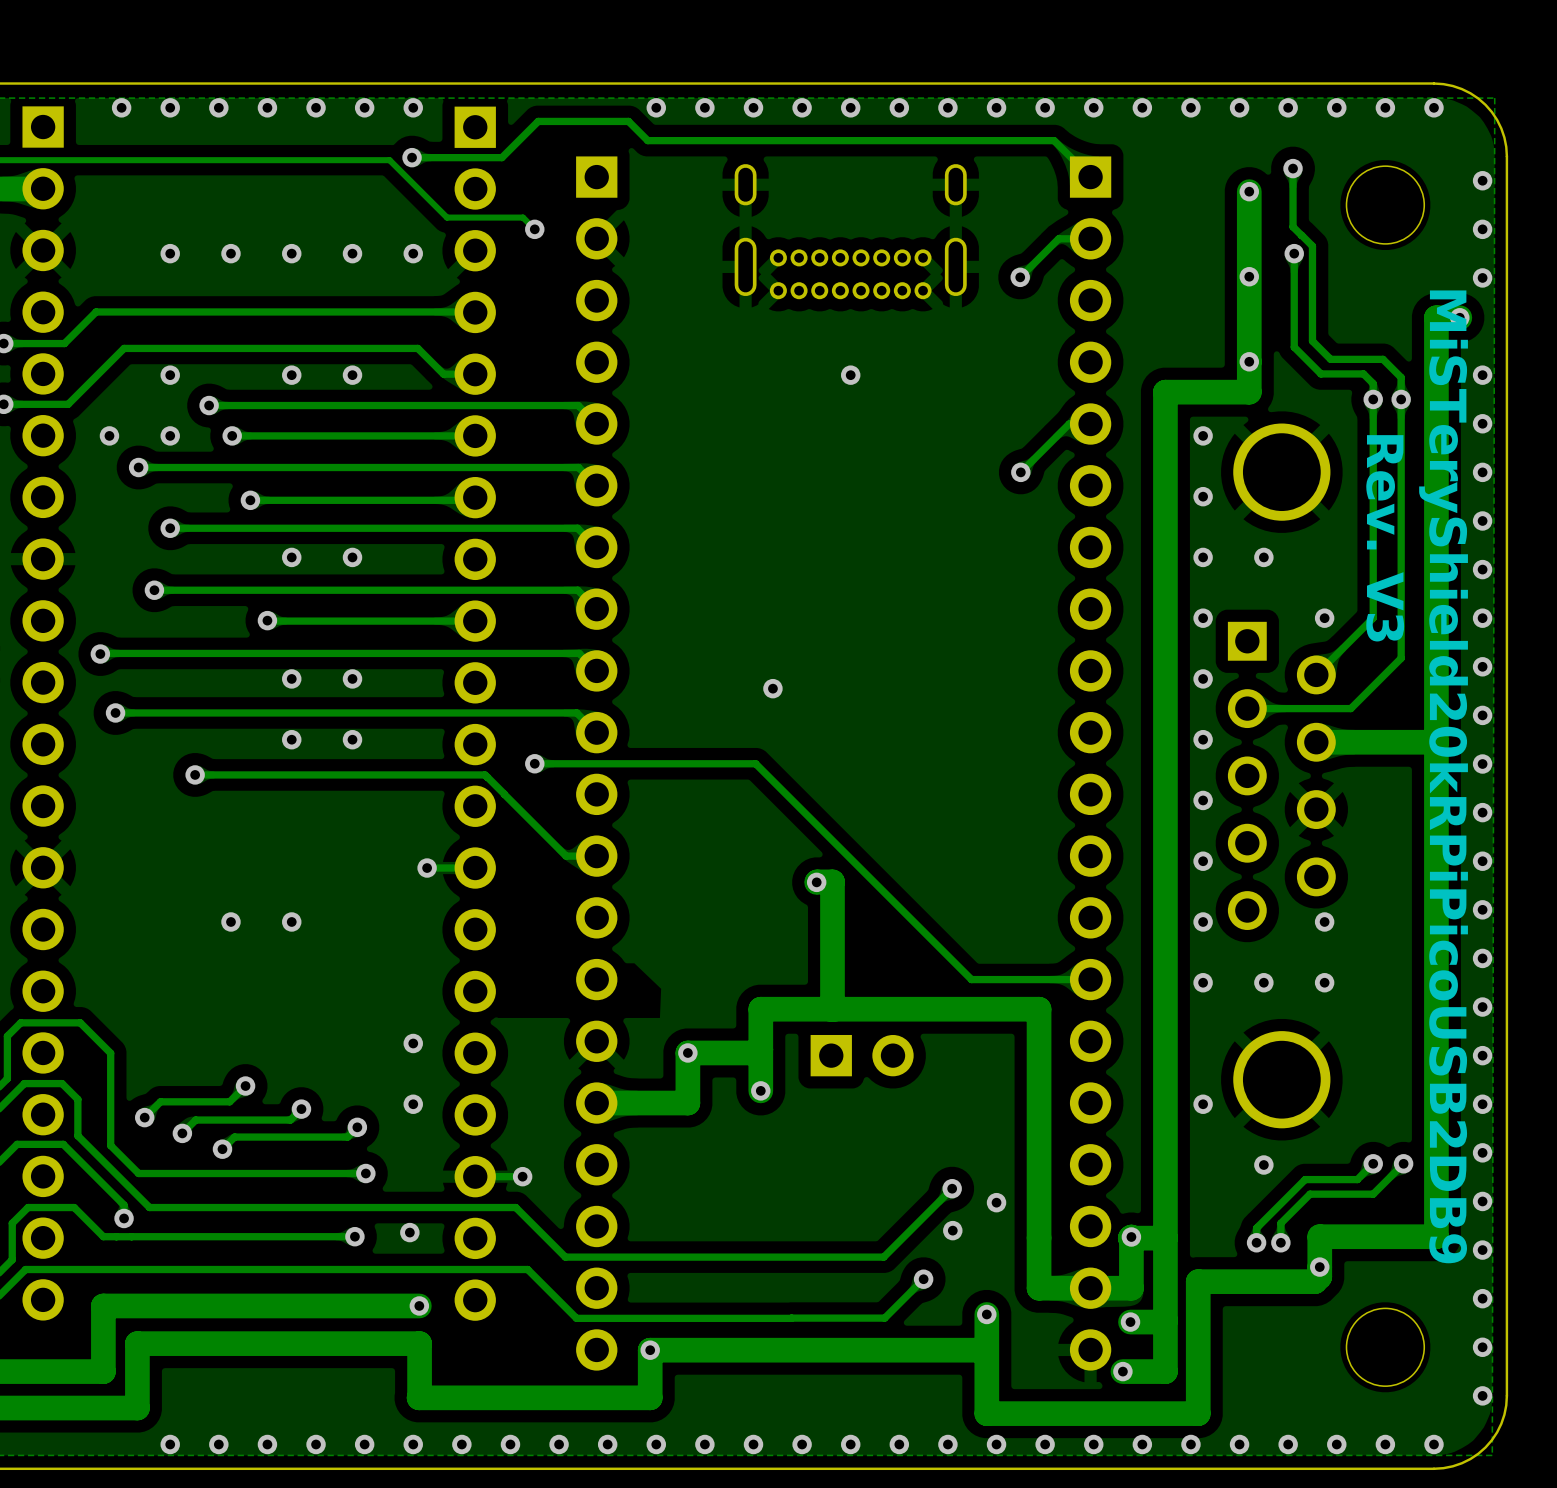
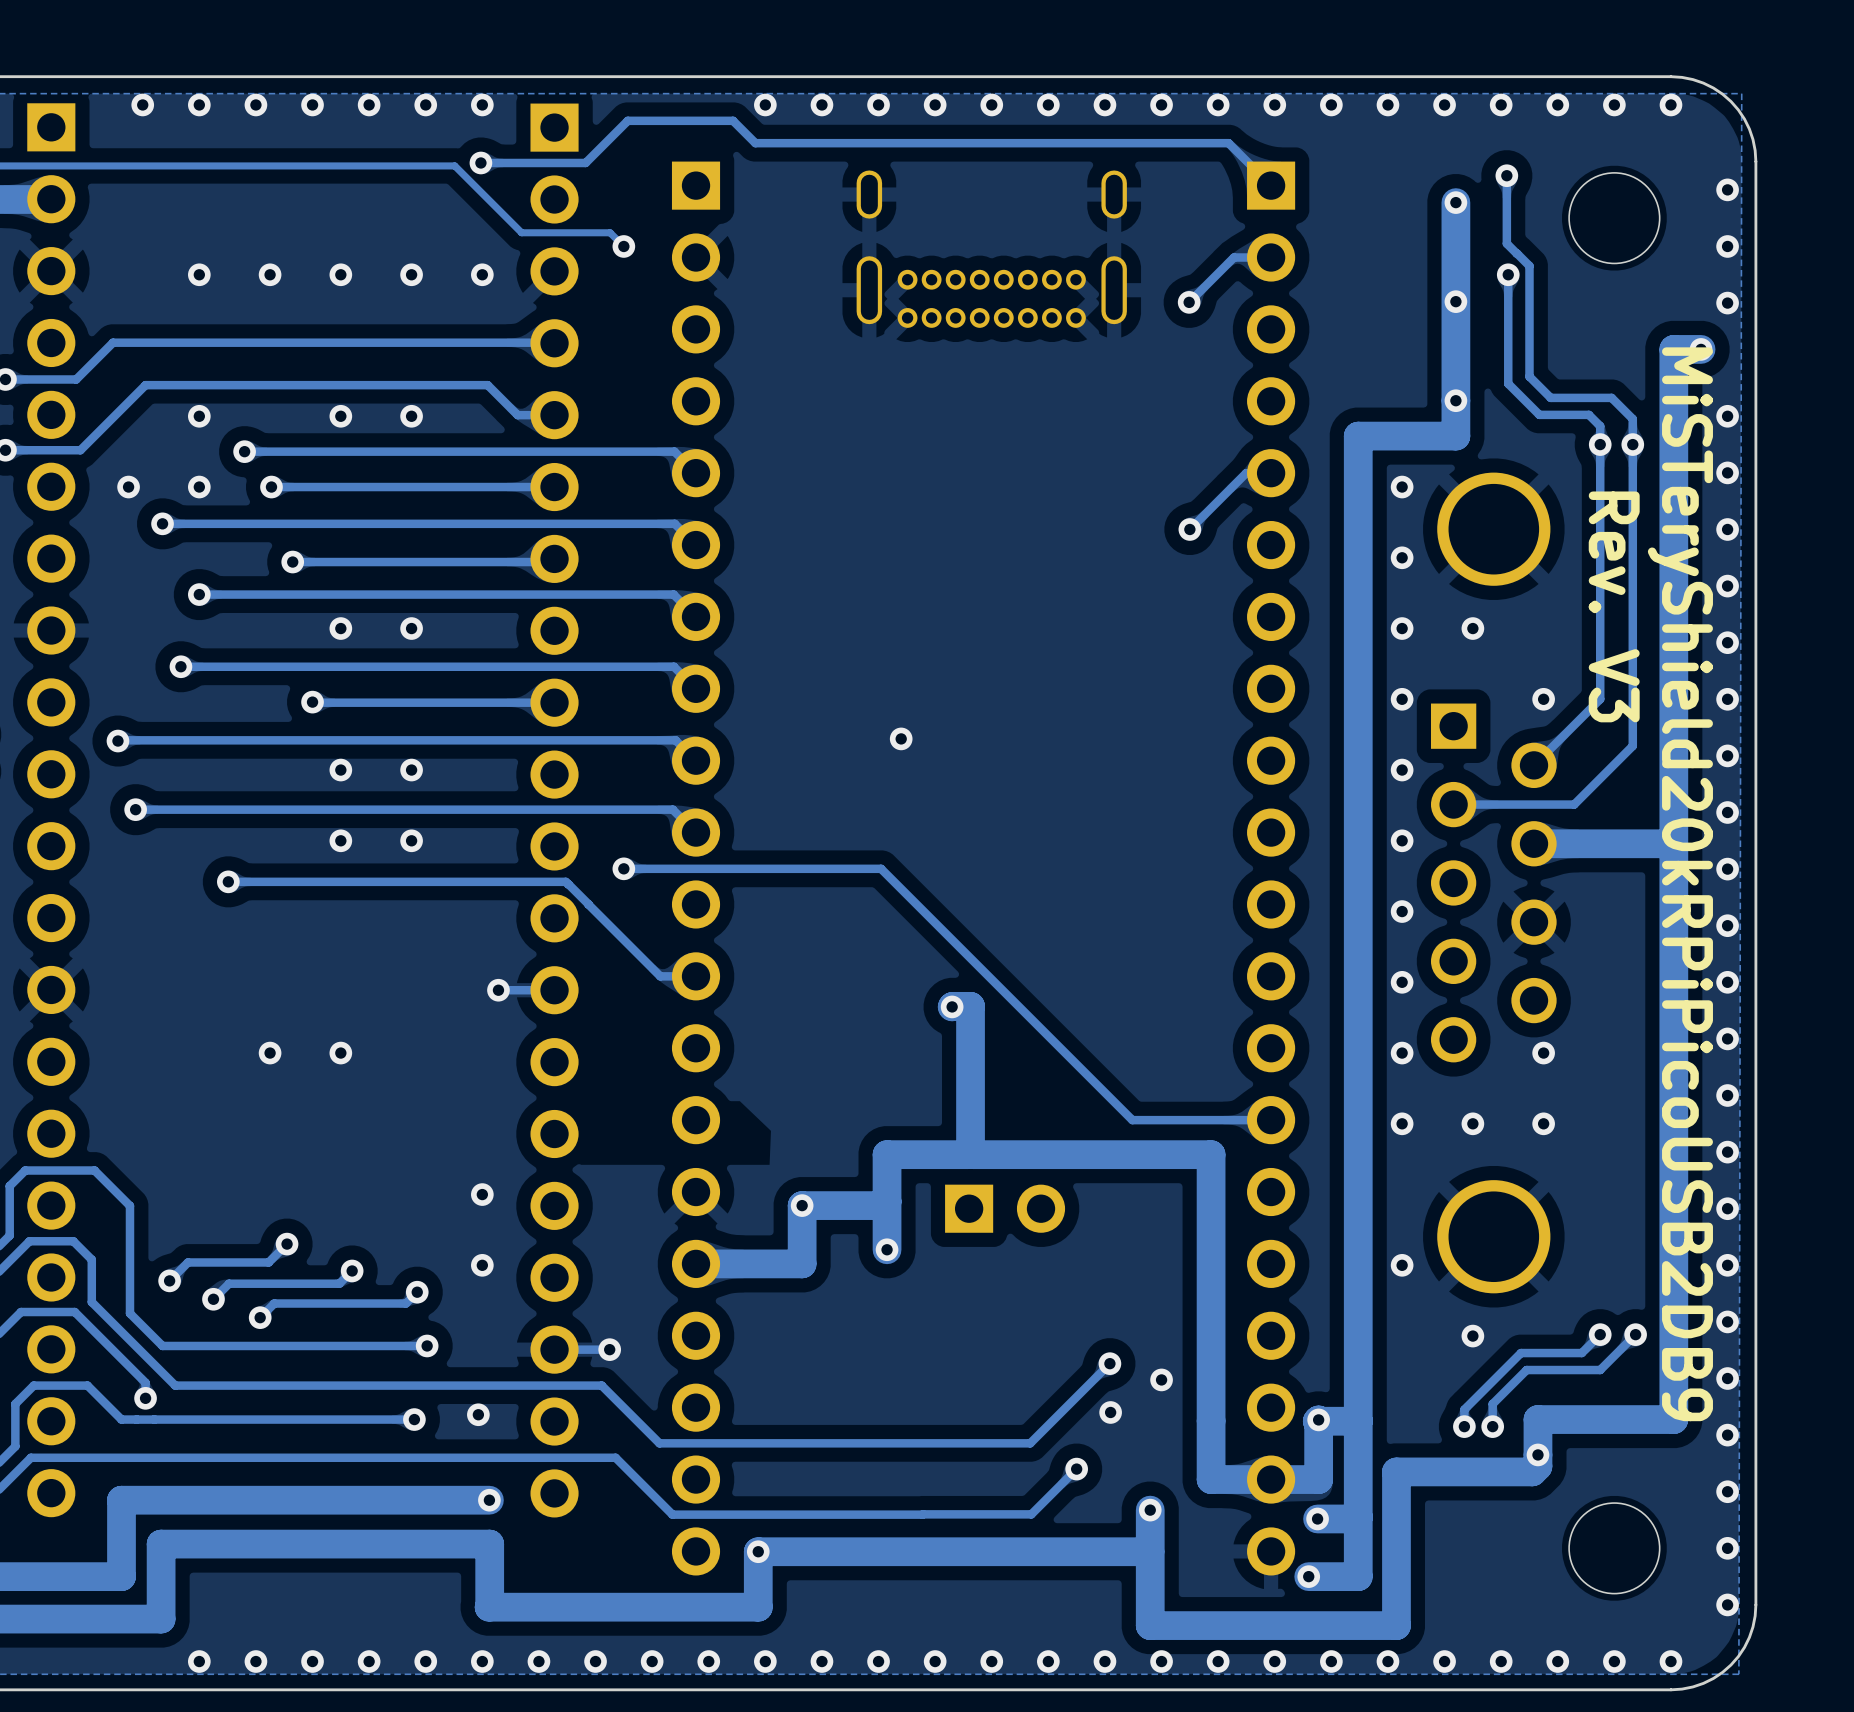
via: (850, 375) -> none
via position: (772, 688) -> (901, 738)

